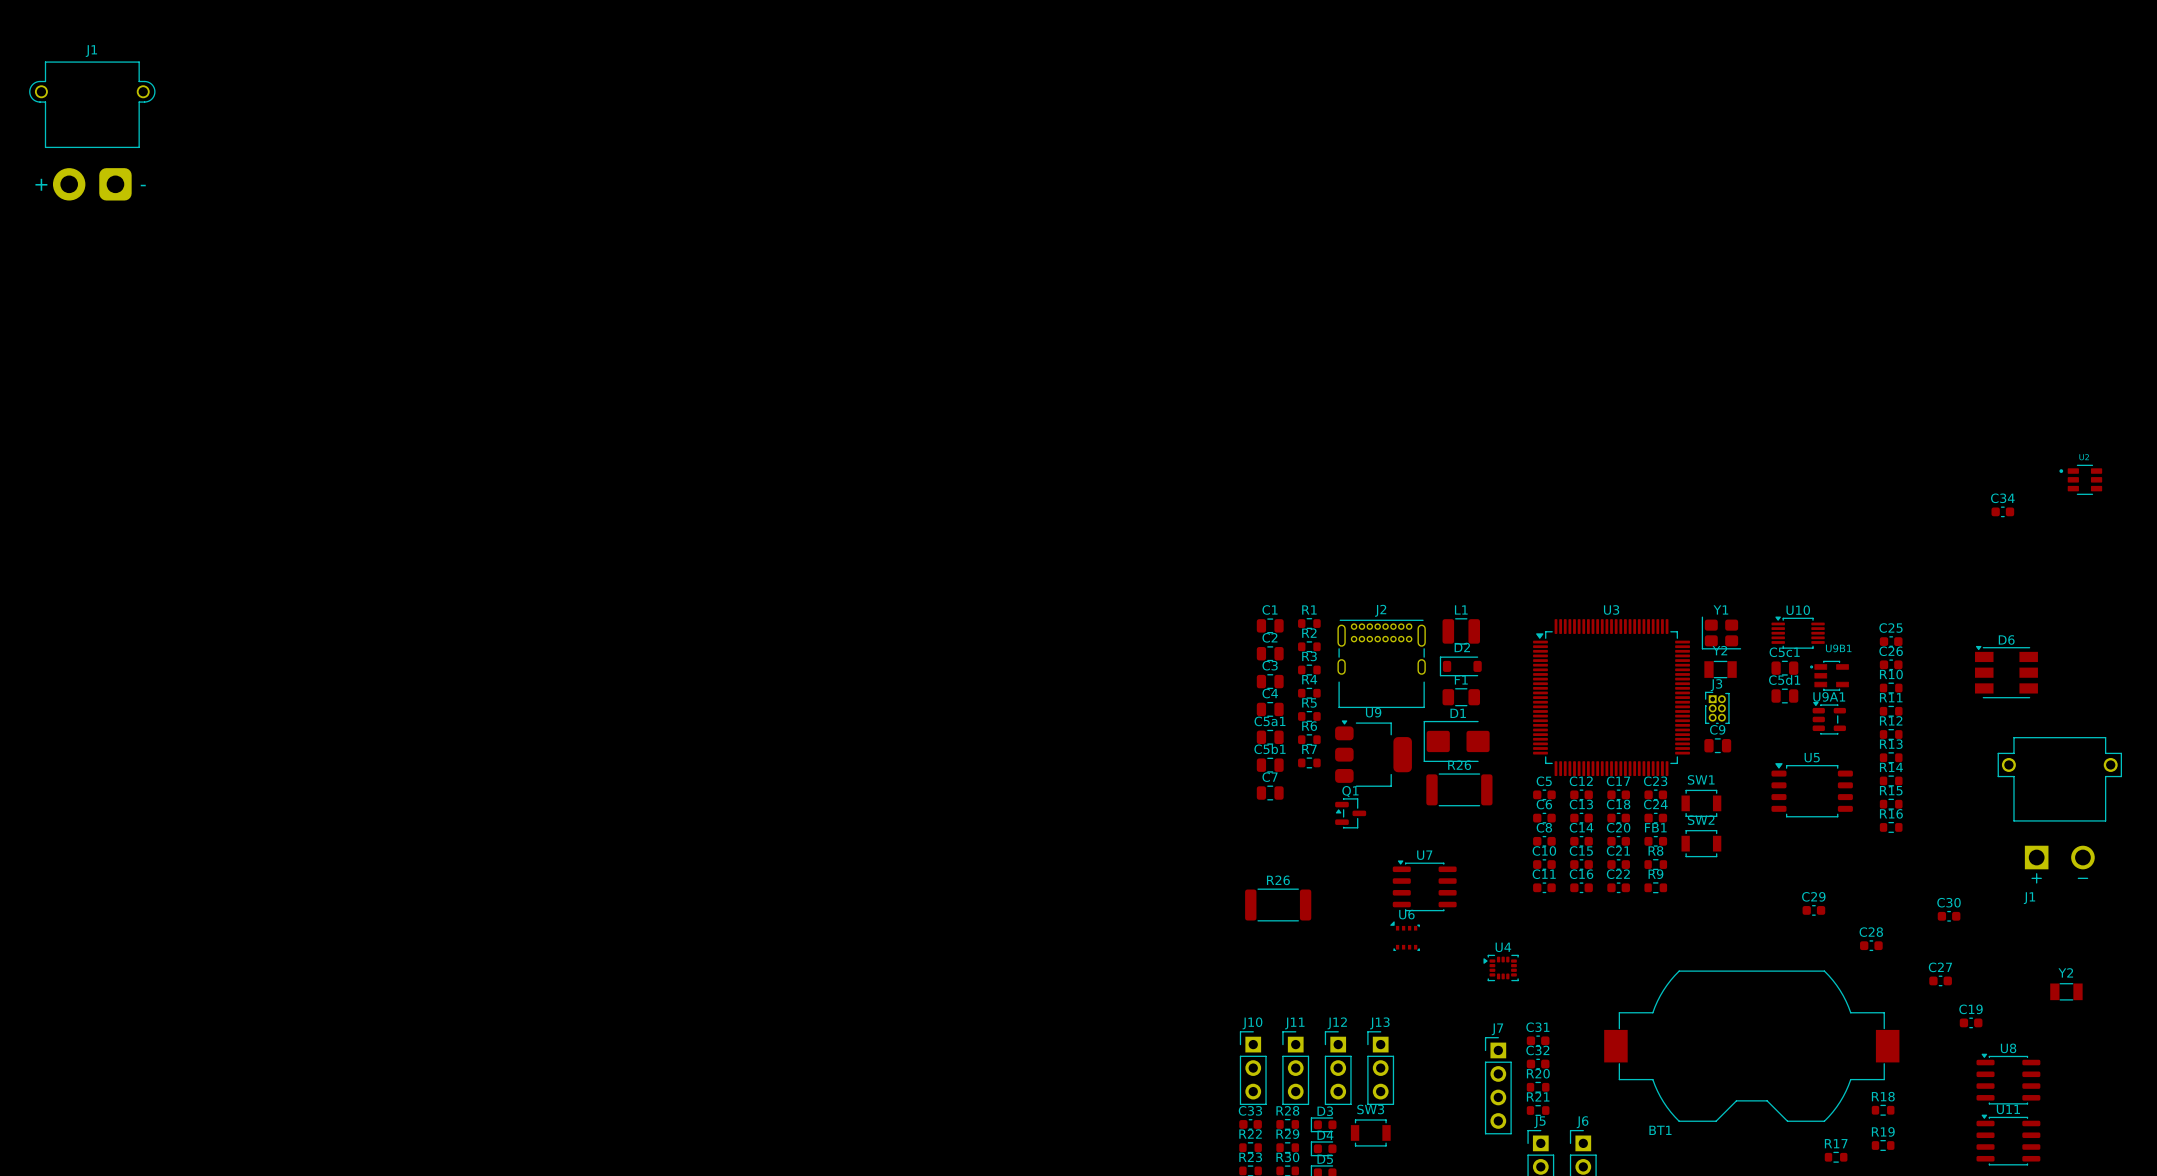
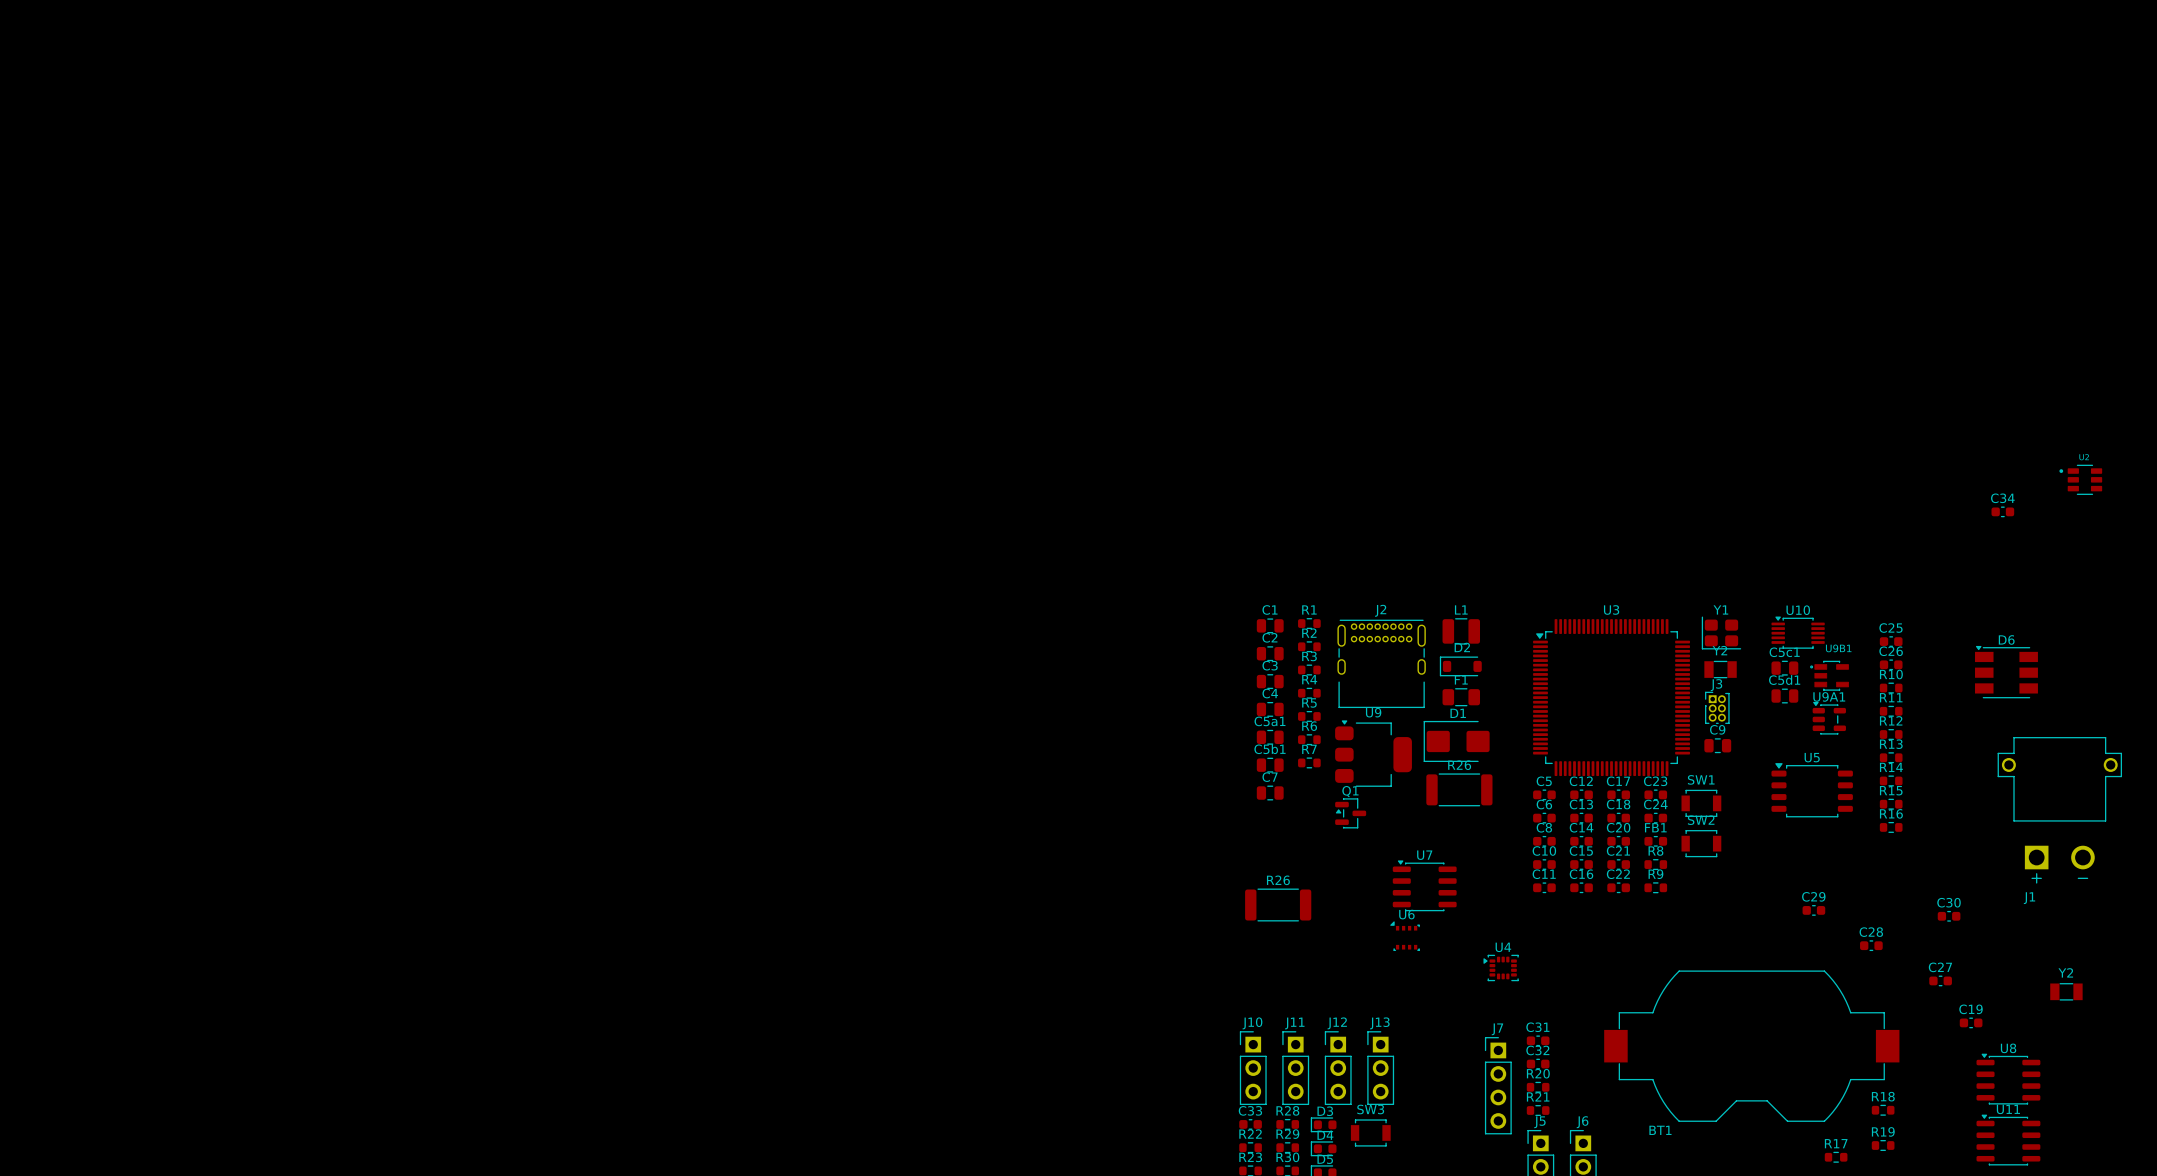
J1: (92, 131) -> none

